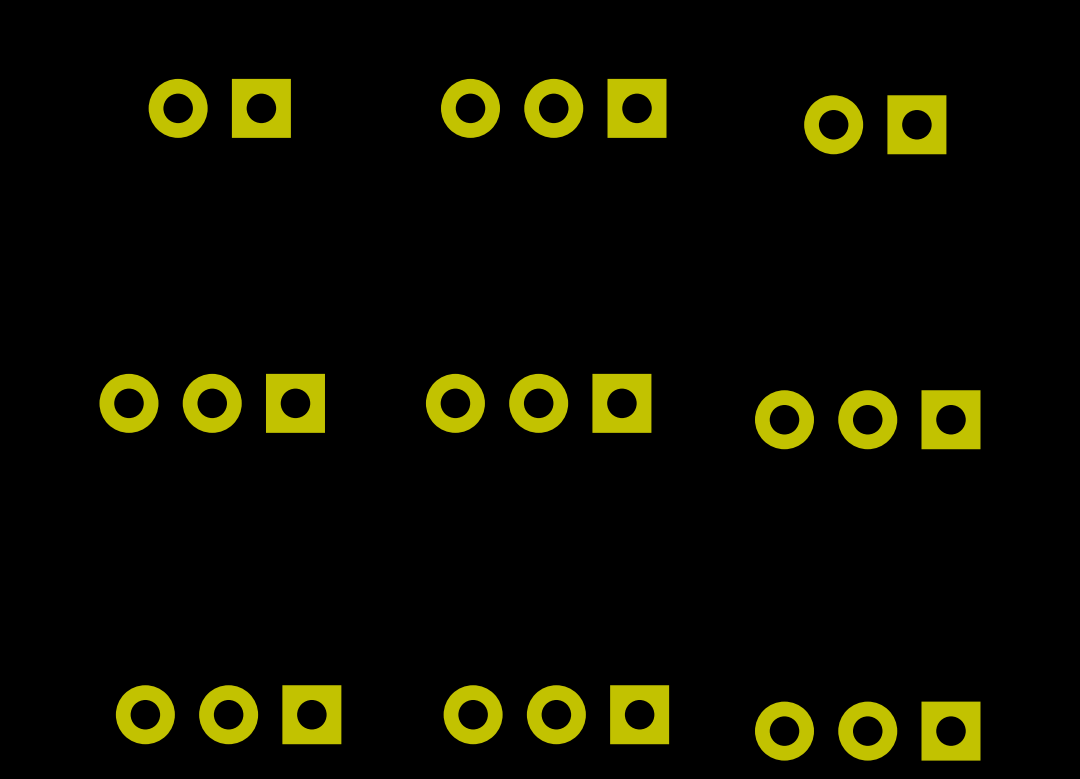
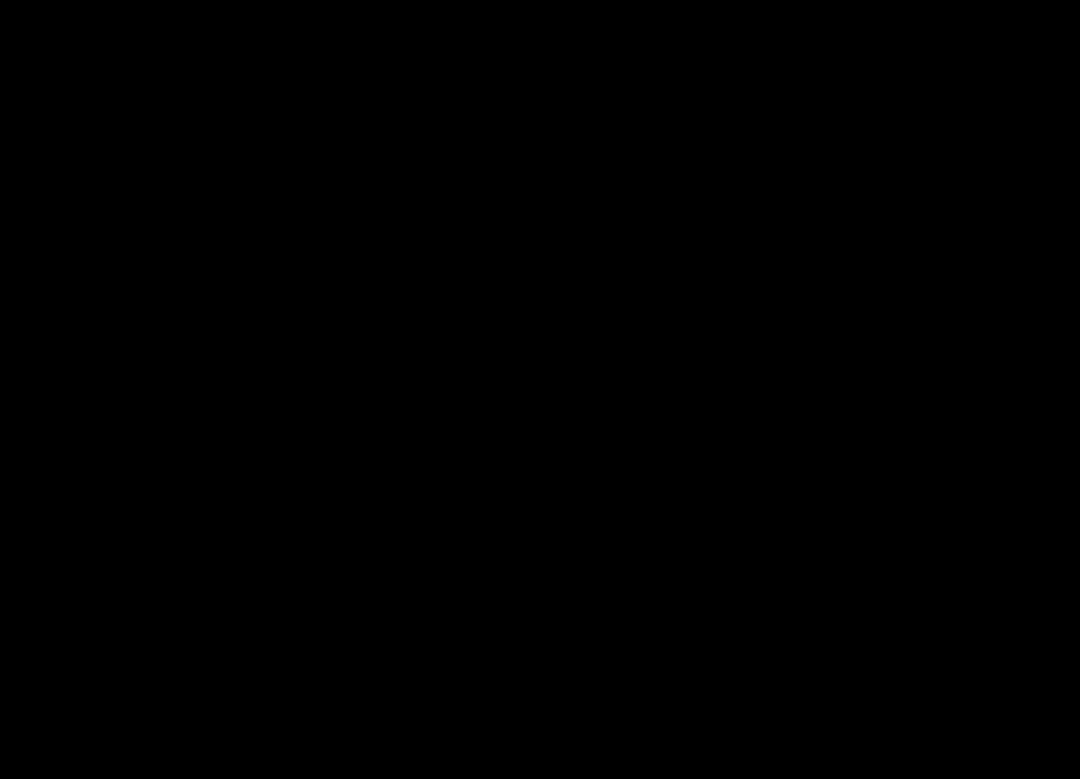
part: (219, 108) -> none
part: (553, 108) -> none
part: (875, 124) -> none
part: (212, 403) -> none
part: (538, 403) -> none
part: (867, 419) -> none
part: (228, 714) -> none
part: (556, 714) -> none
part: (867, 731) -> none

